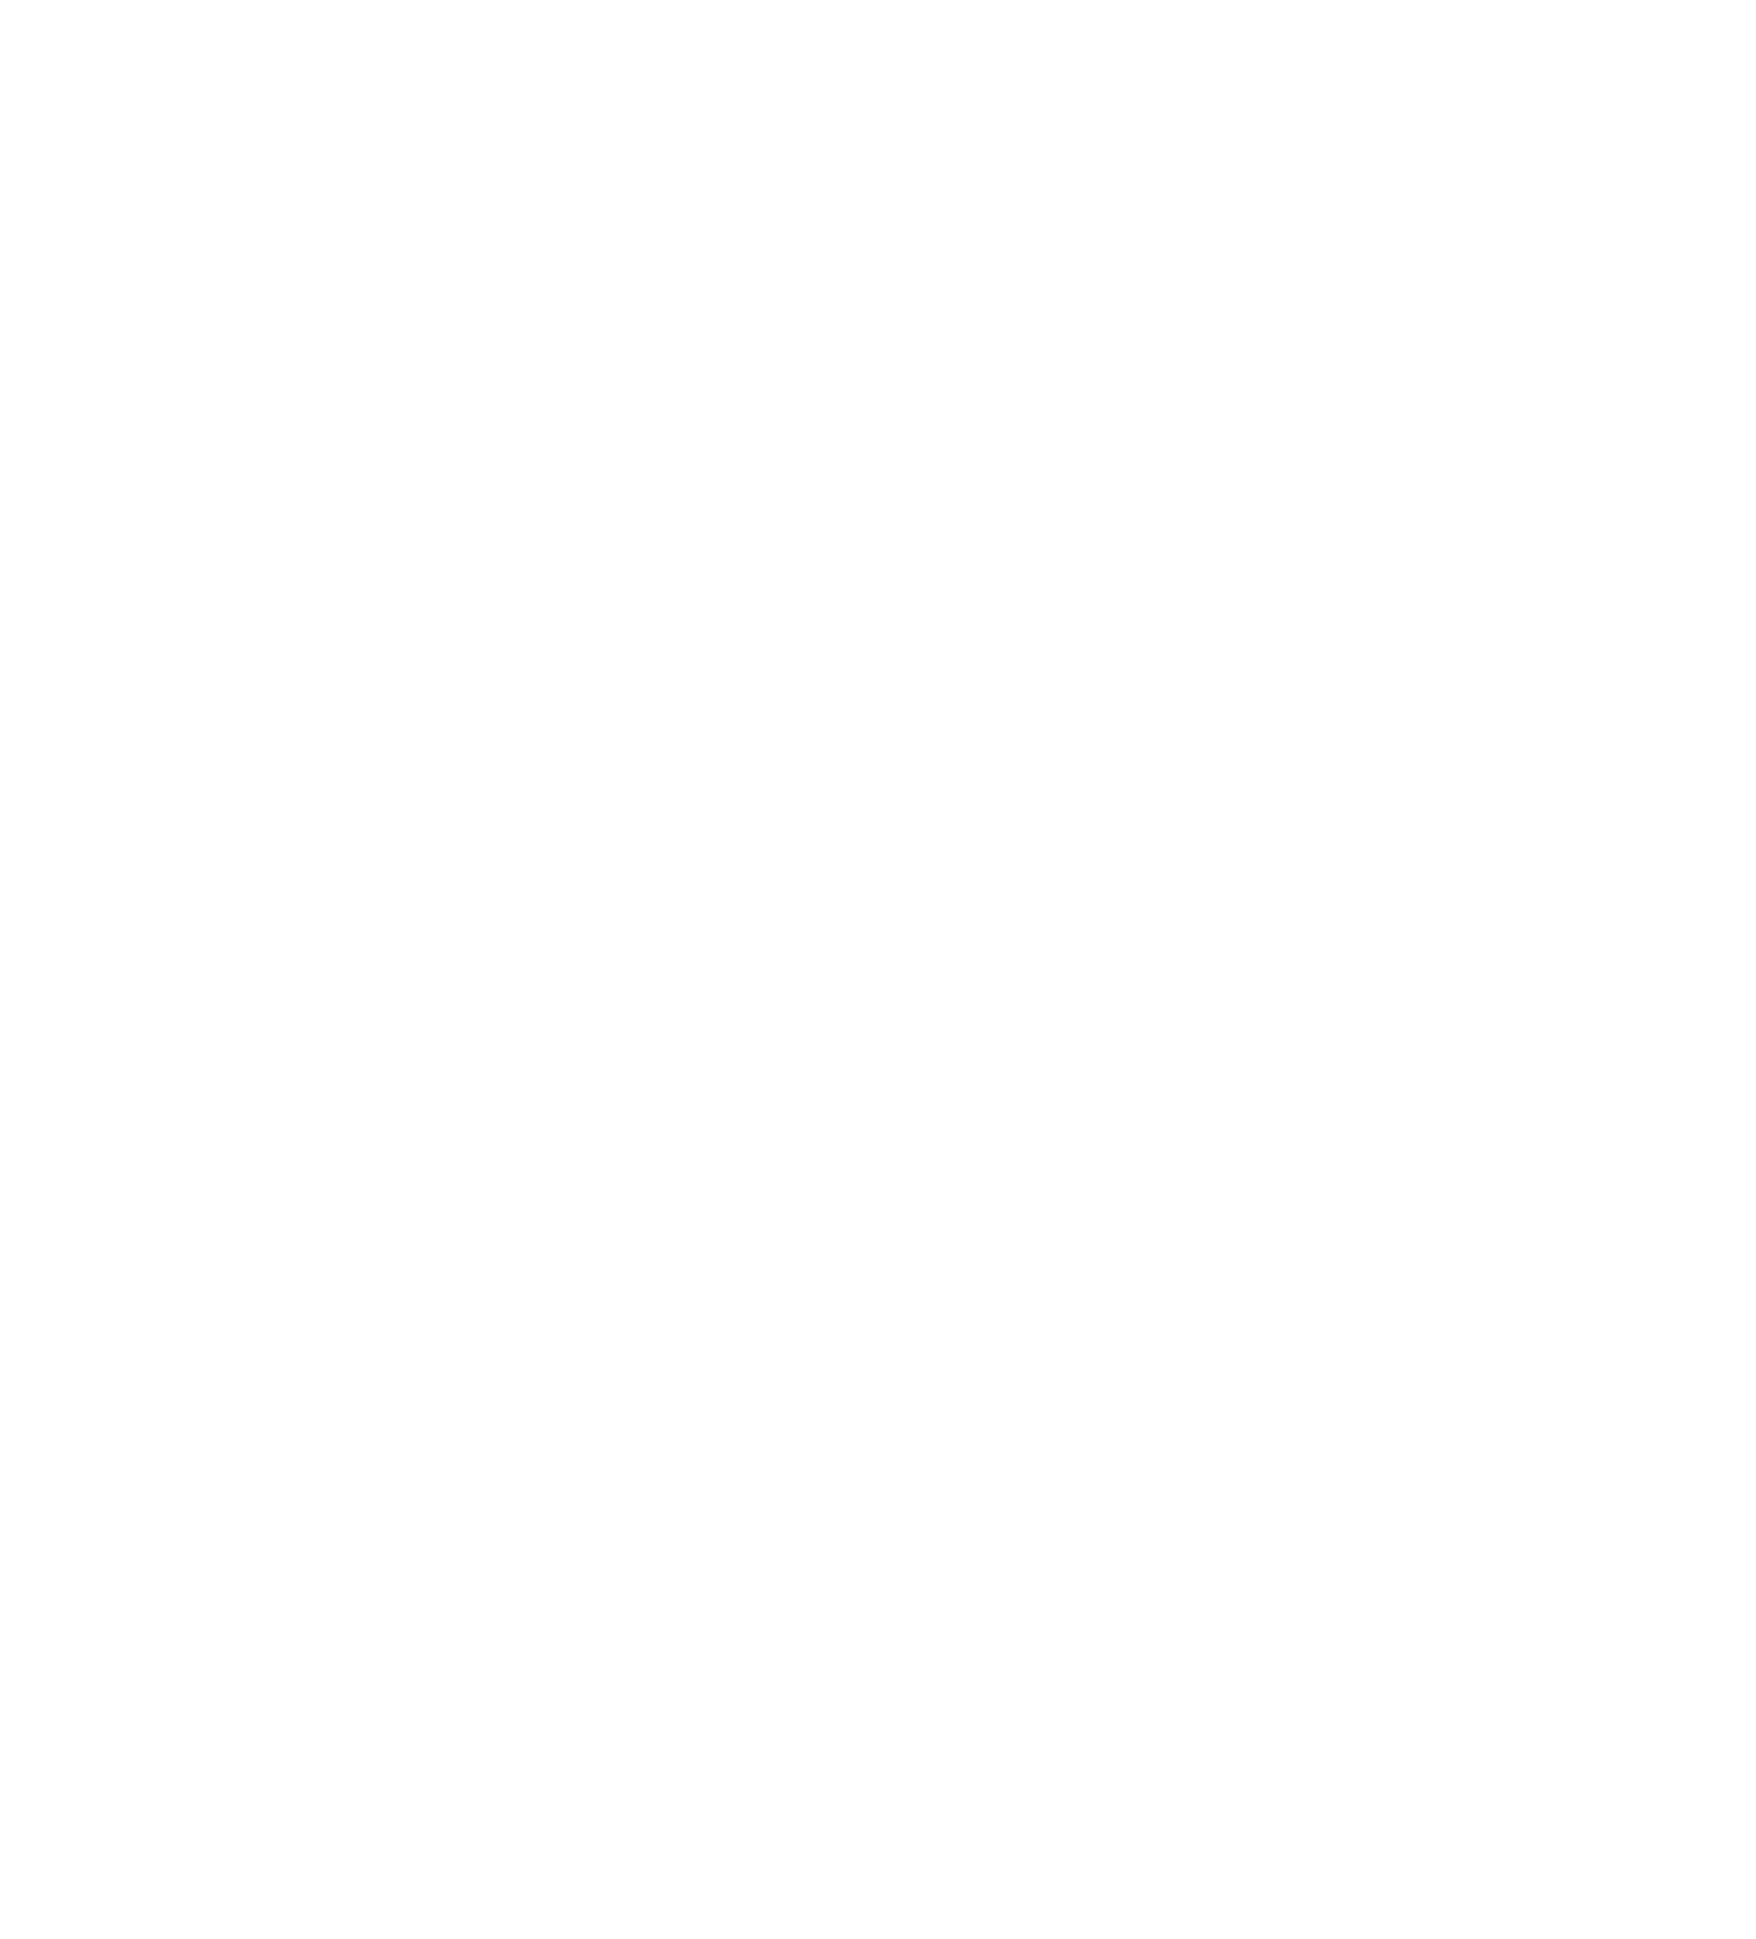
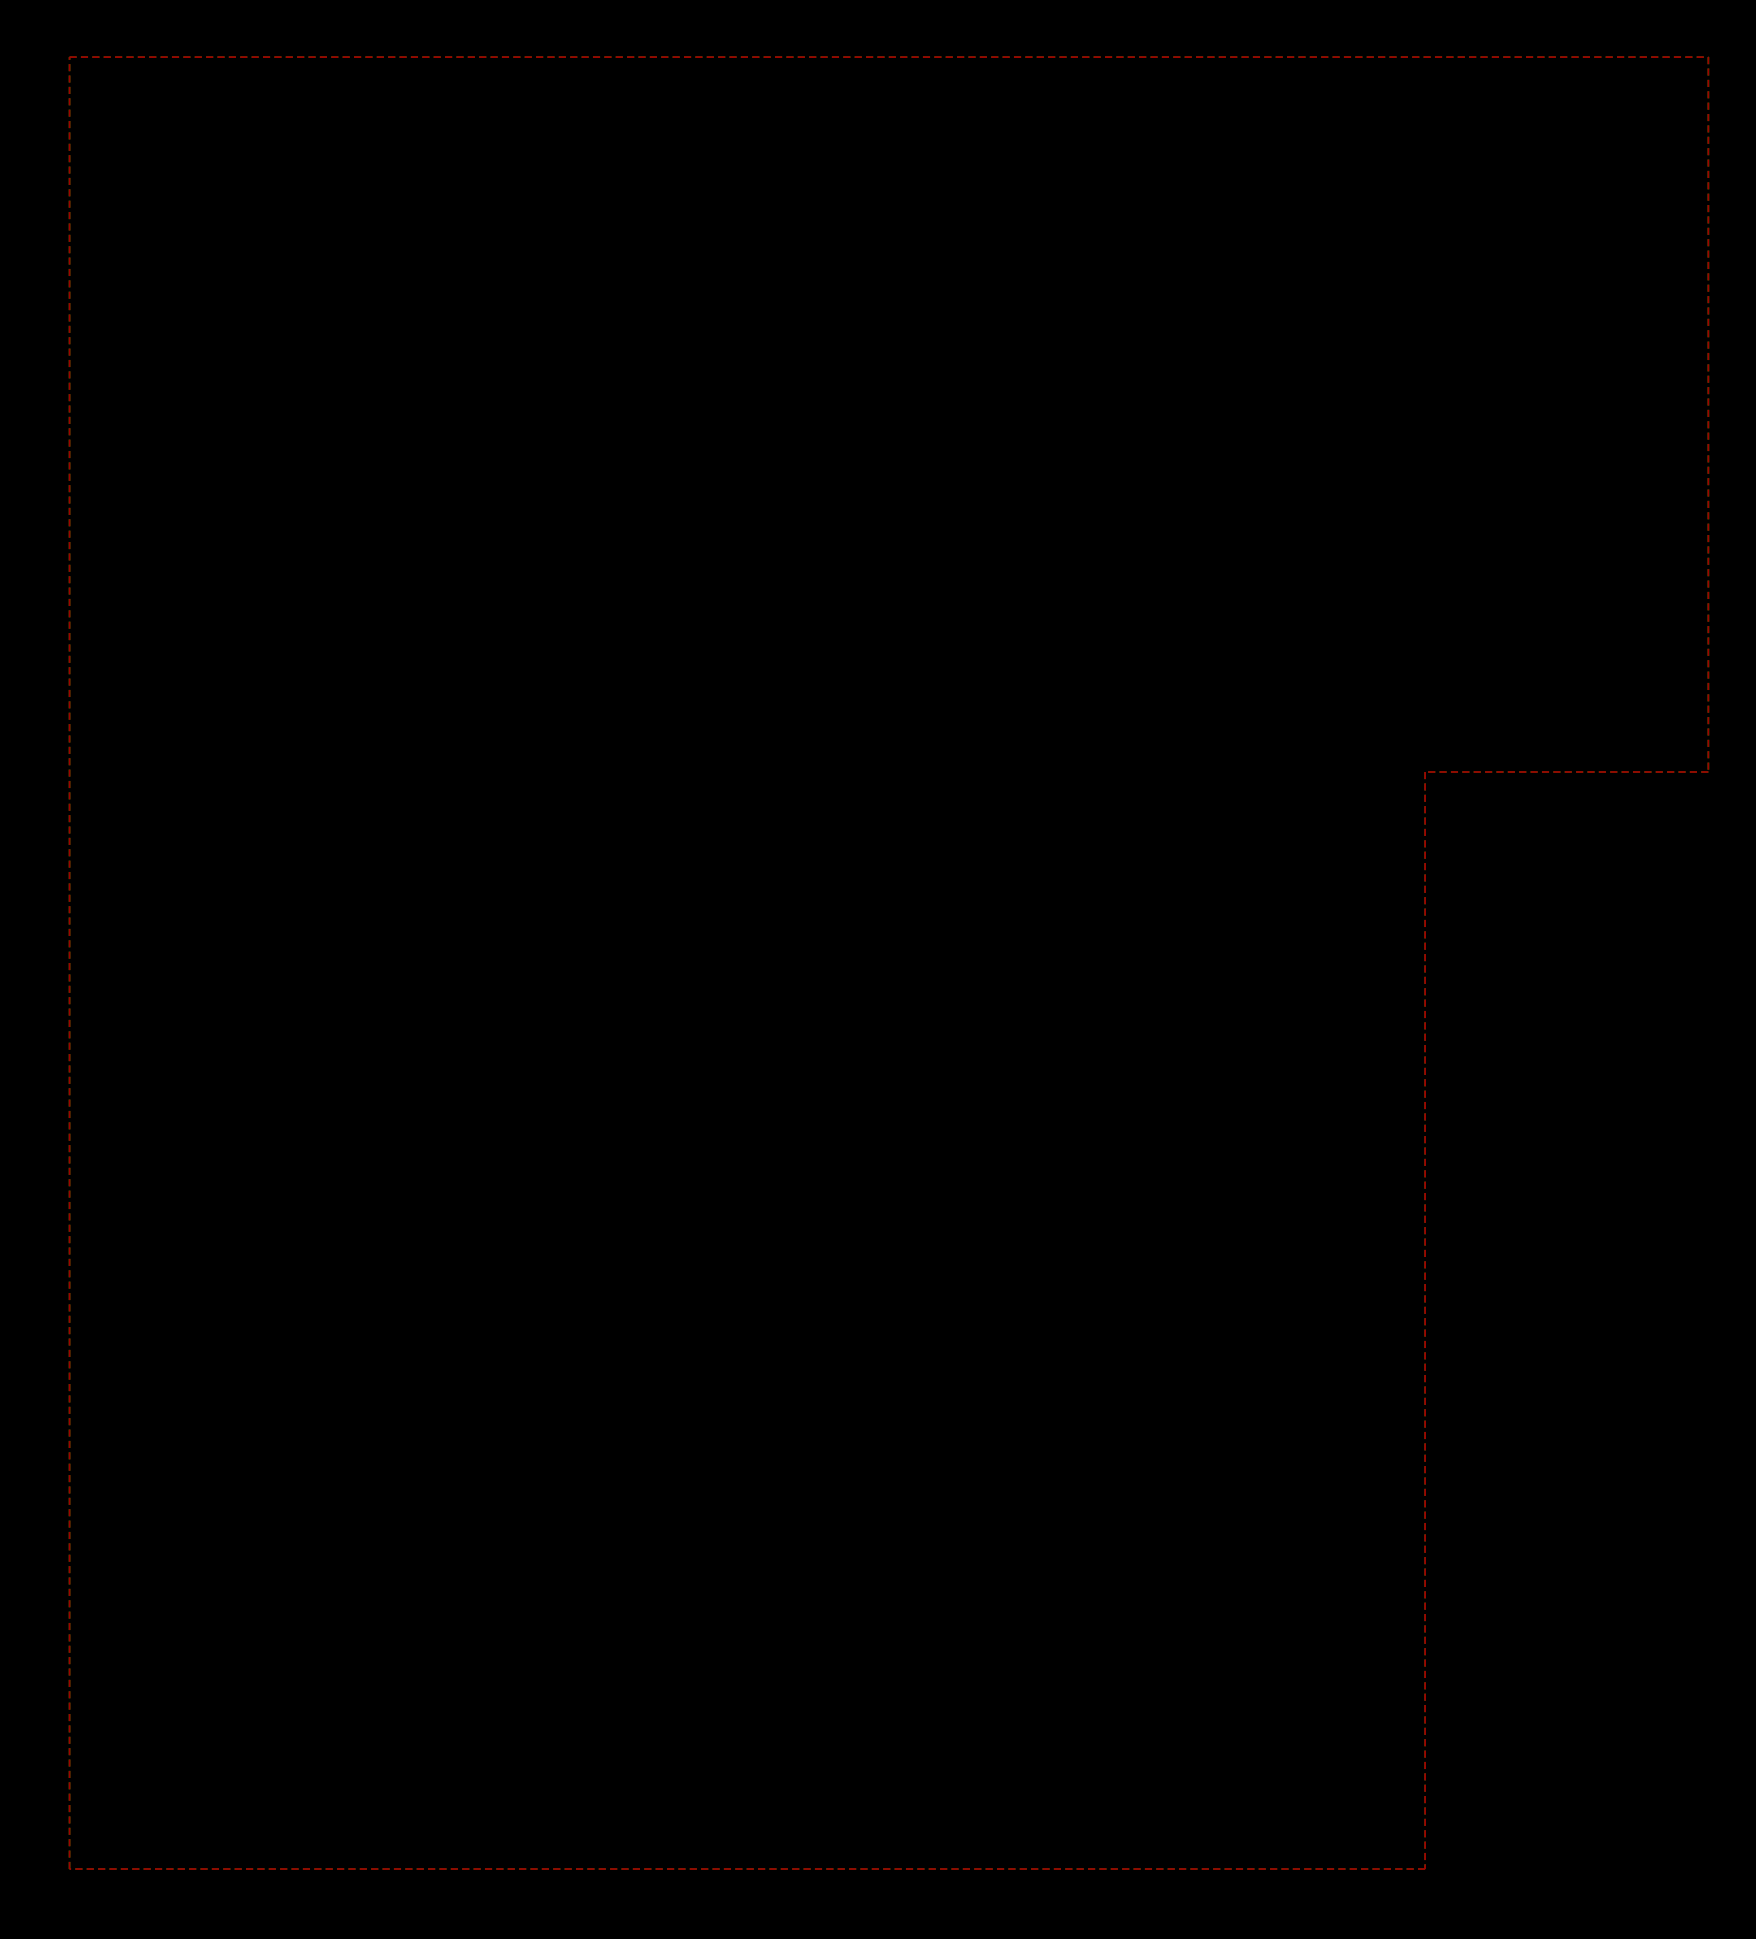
top zone outline: none -> (69, 57) (1708, 57) (1708, 771) (1425, 771) (1425, 1869) (69, 1869) (69, 57)

